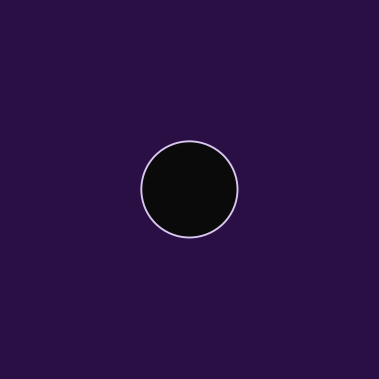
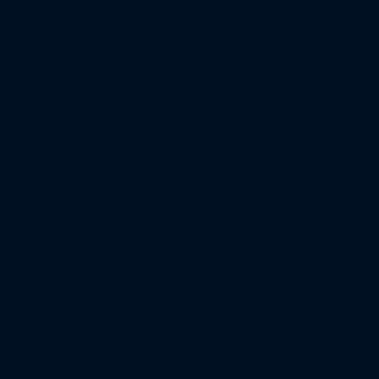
part: (189, 189) -> none

